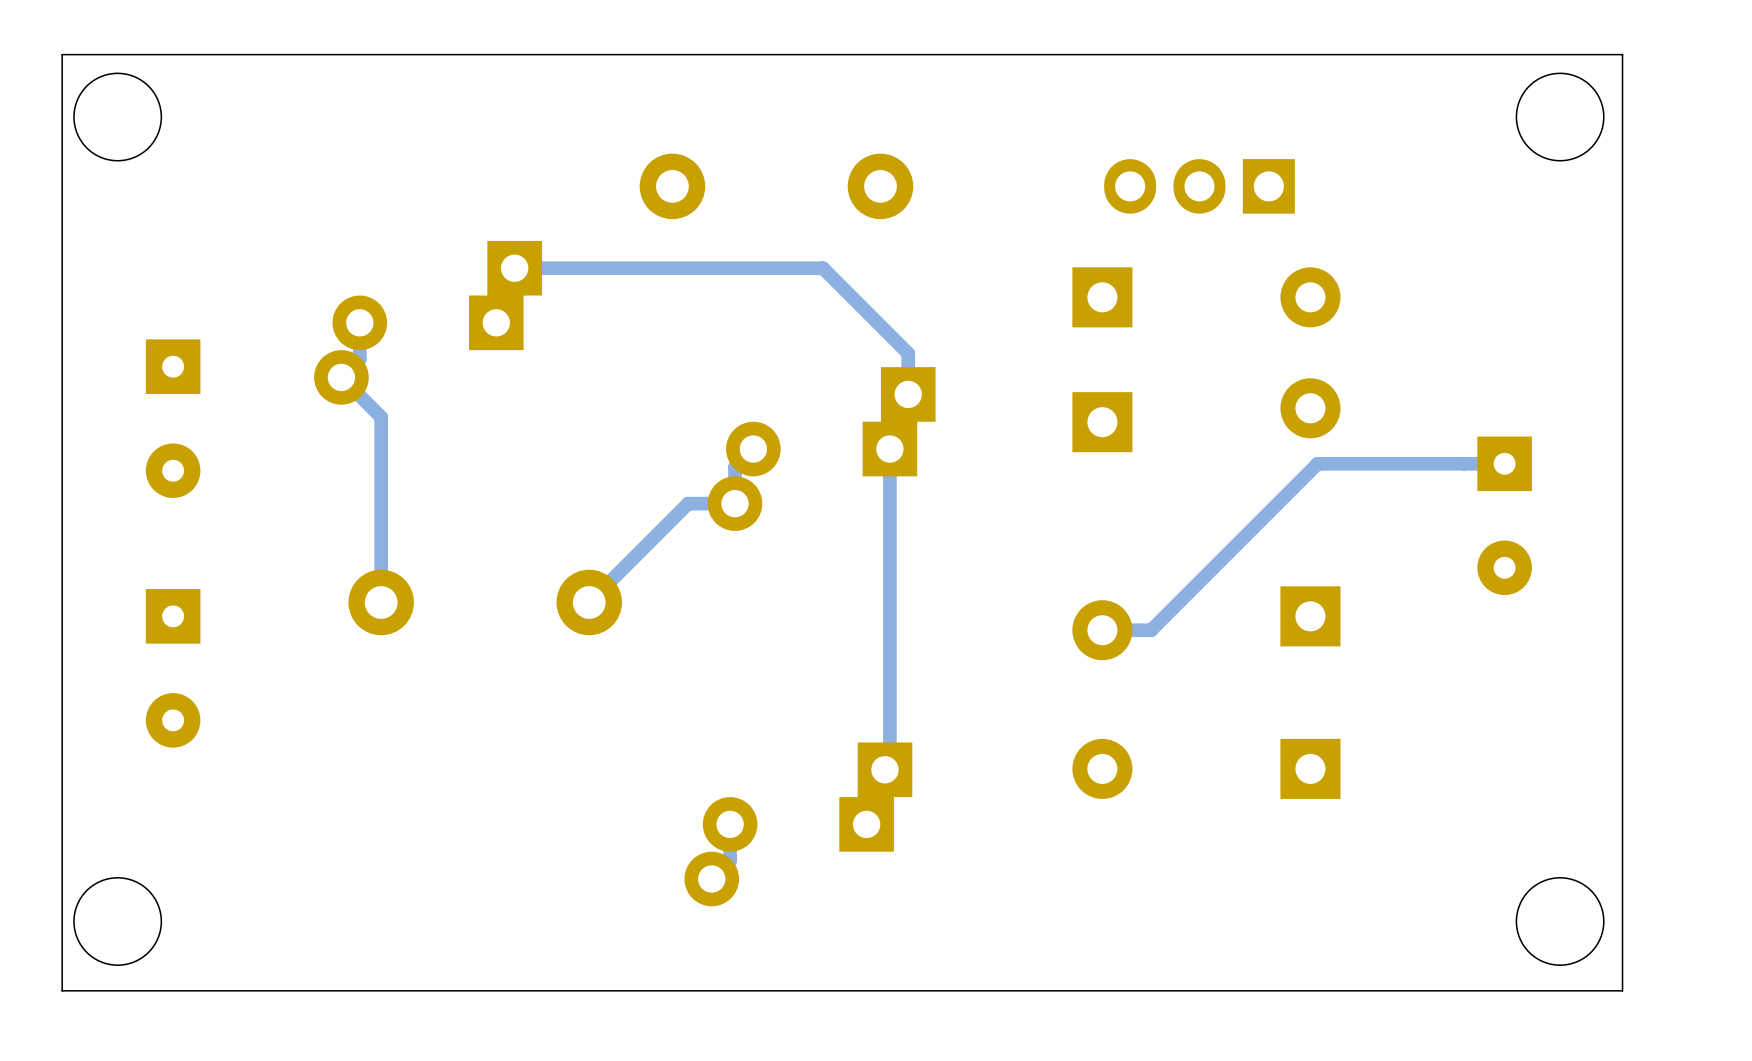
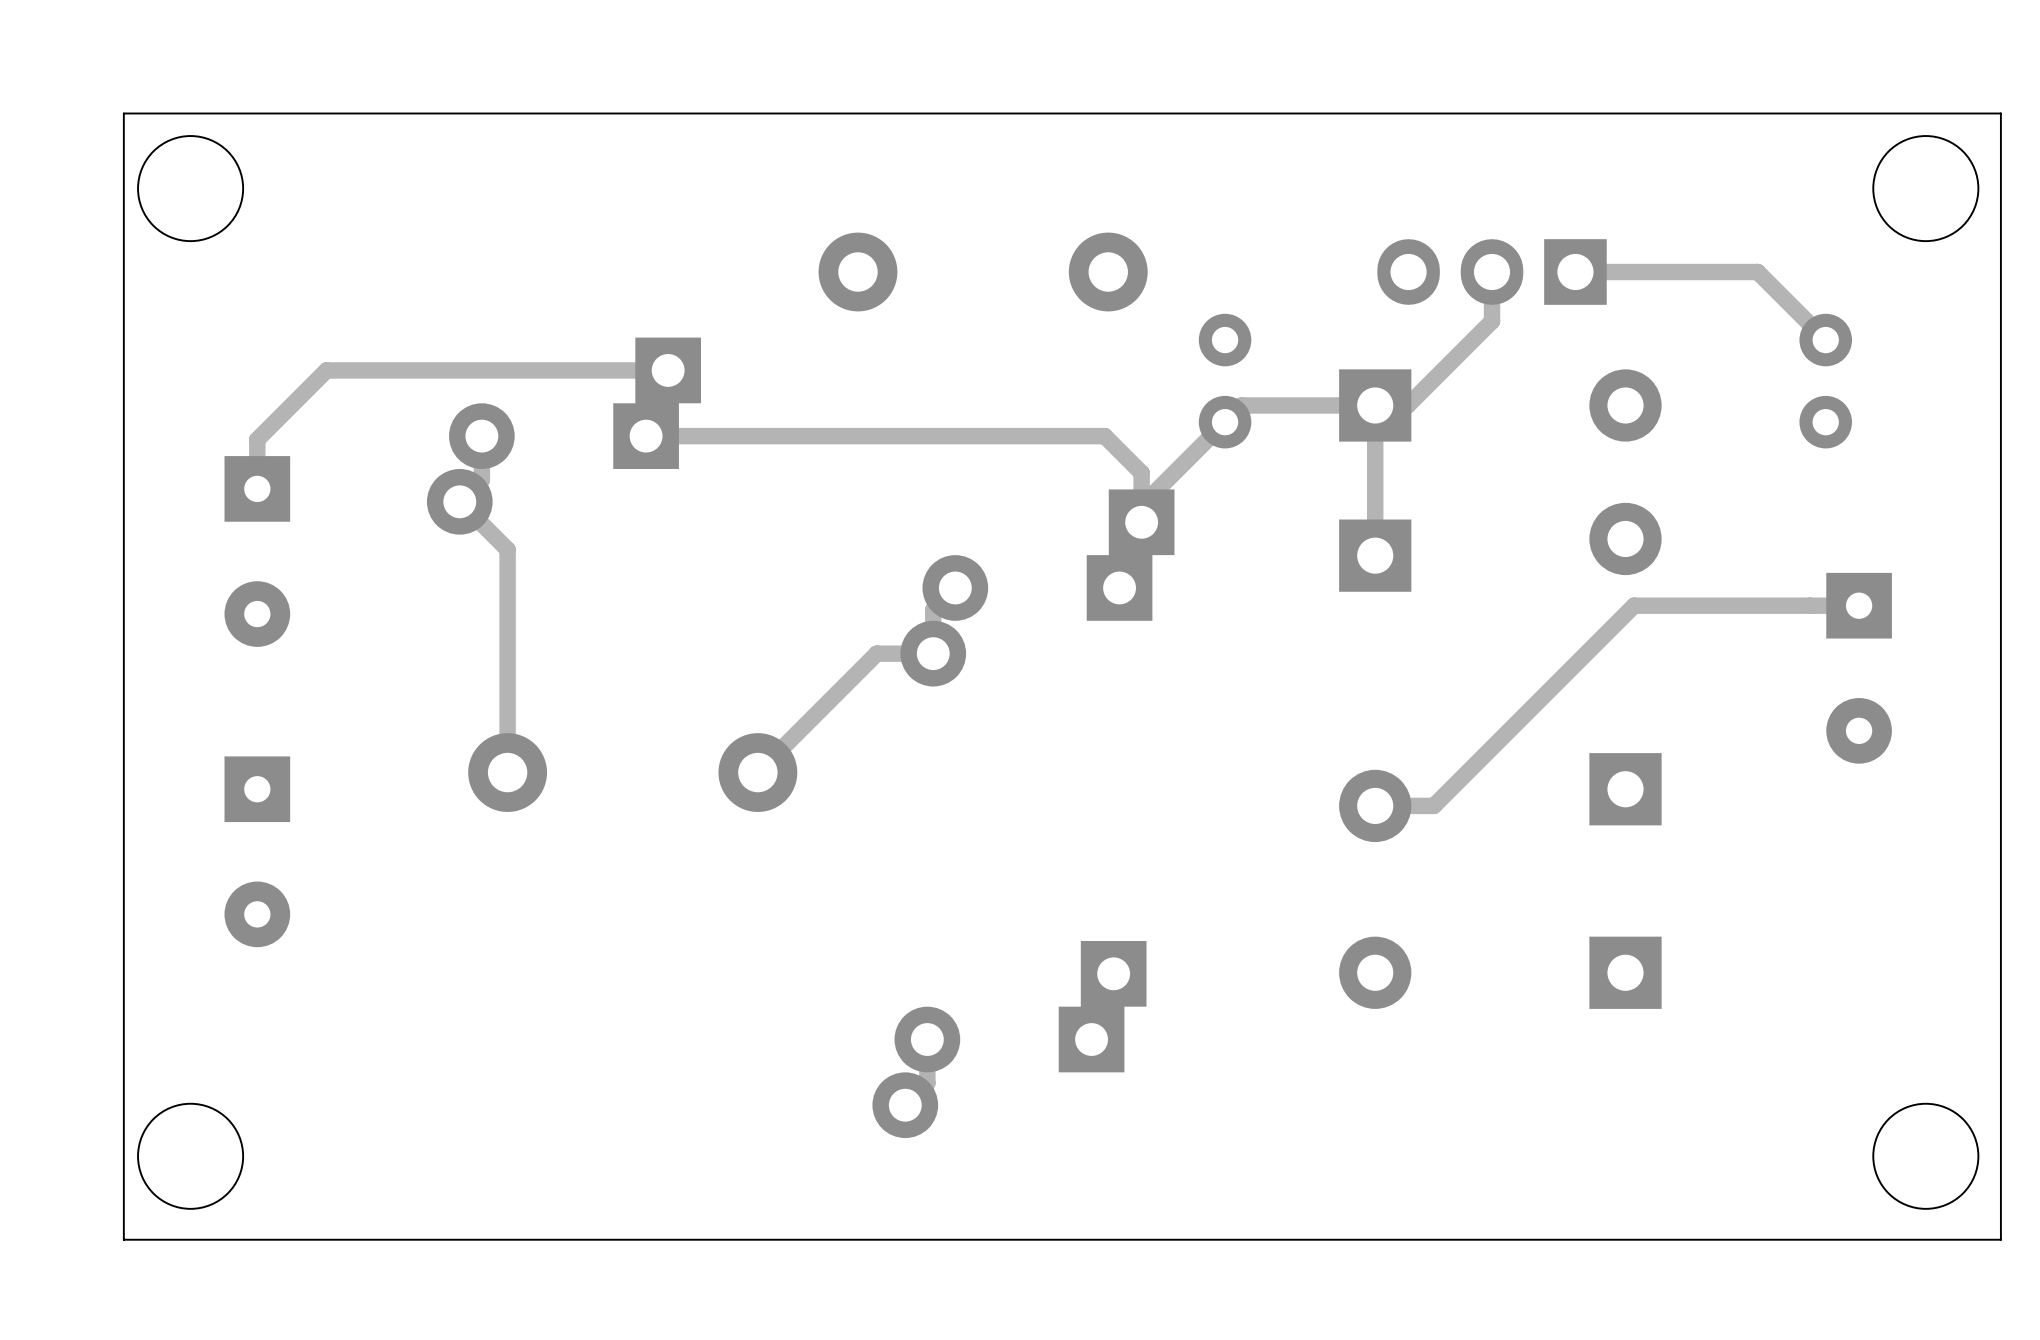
track: none -> (1492, 272) (1492, 321) (1407, 405) (1241, 405) (1141, 505)
track: none -> (1575, 272) (1757, 272) (1825, 340)
track: none -> (668, 370) (326, 370) (257, 439) (257, 488)
part: none -> (1225, 381)
part: none -> (1825, 381)
track: none -> (1375, 405) (1375, 555)
track: (877, 322) (822, 268) (514, 268) (514, 304) (496, 322) -> (1104, 436) (646, 436)
track: (908, 394) (889, 412) (889, 764) (884, 769) (884, 806) (866, 824) -> none

